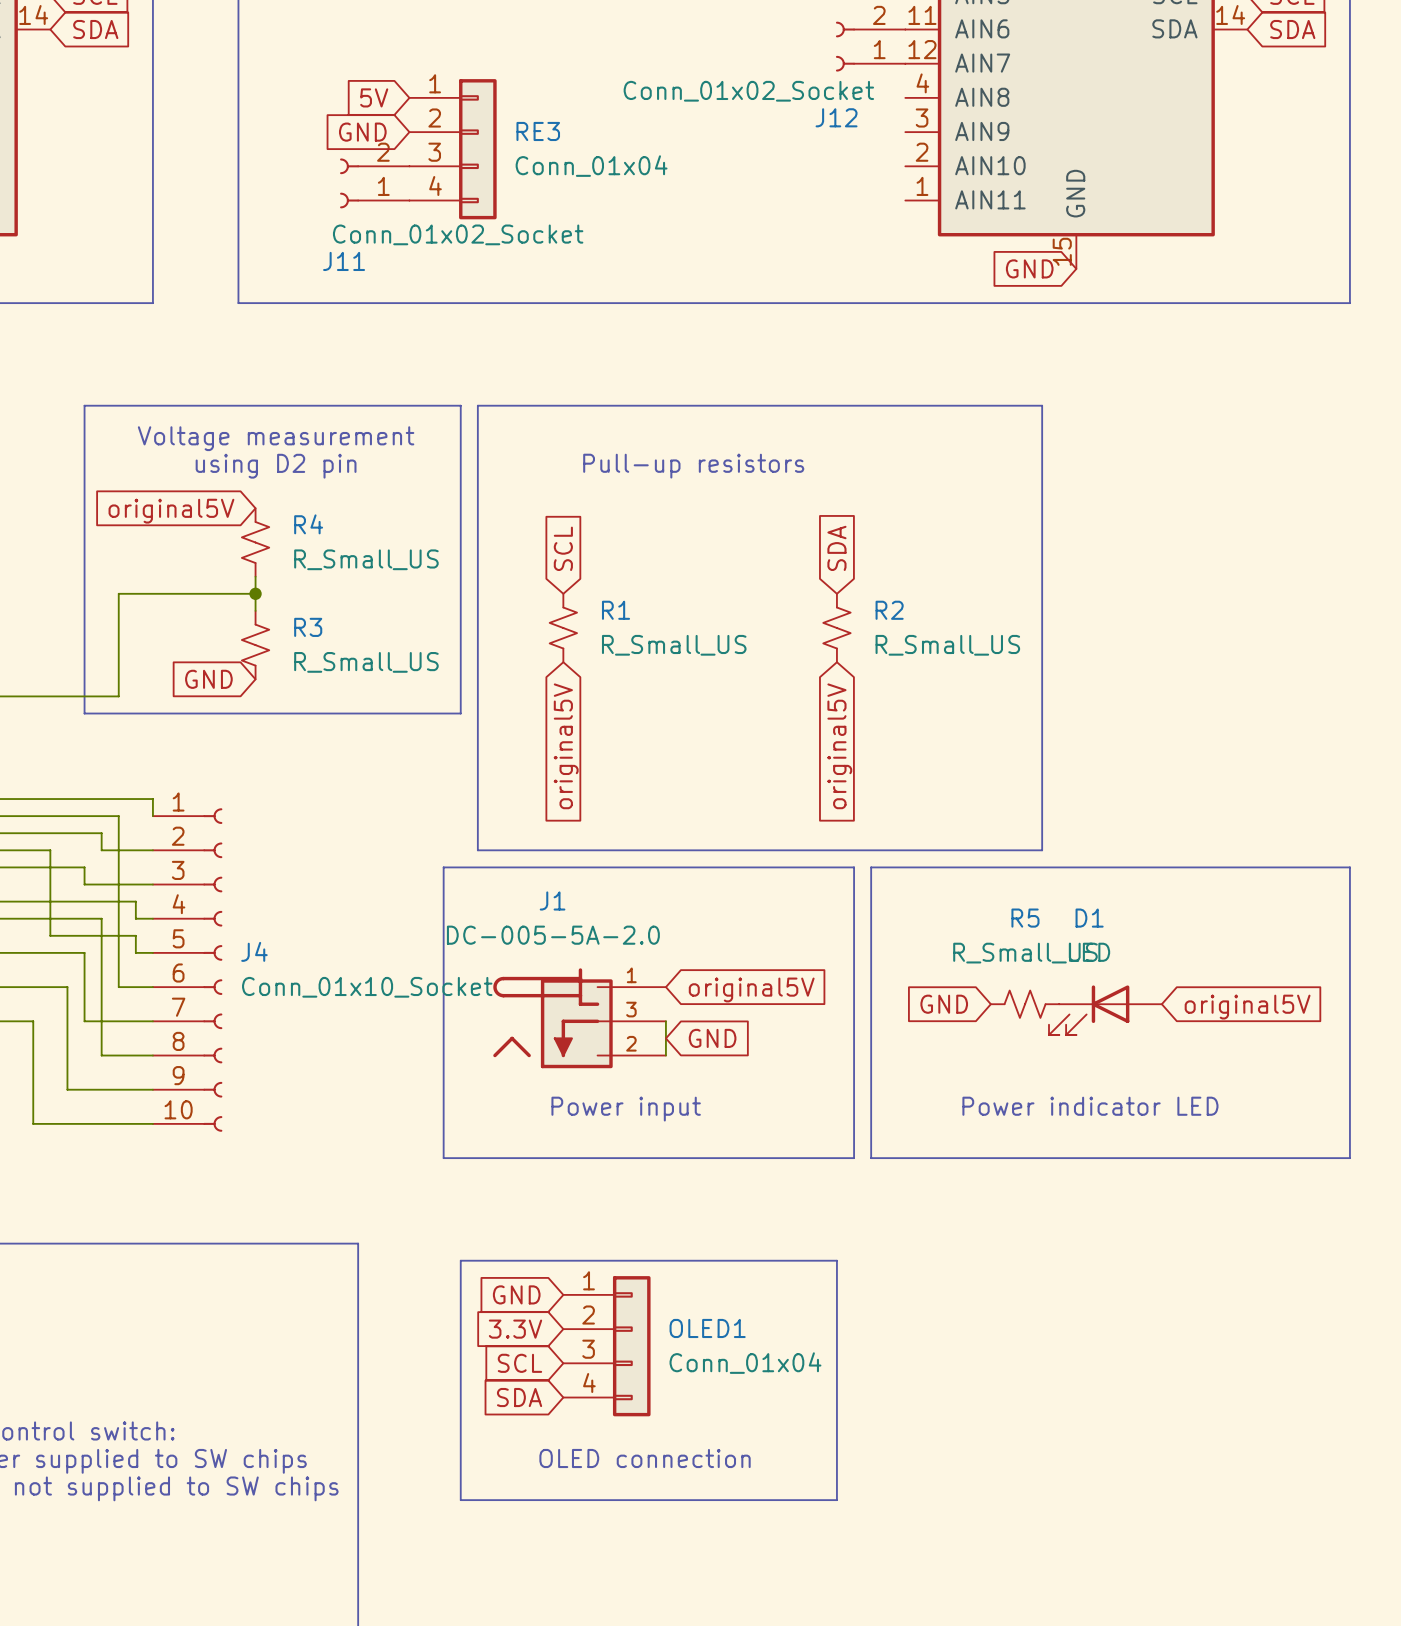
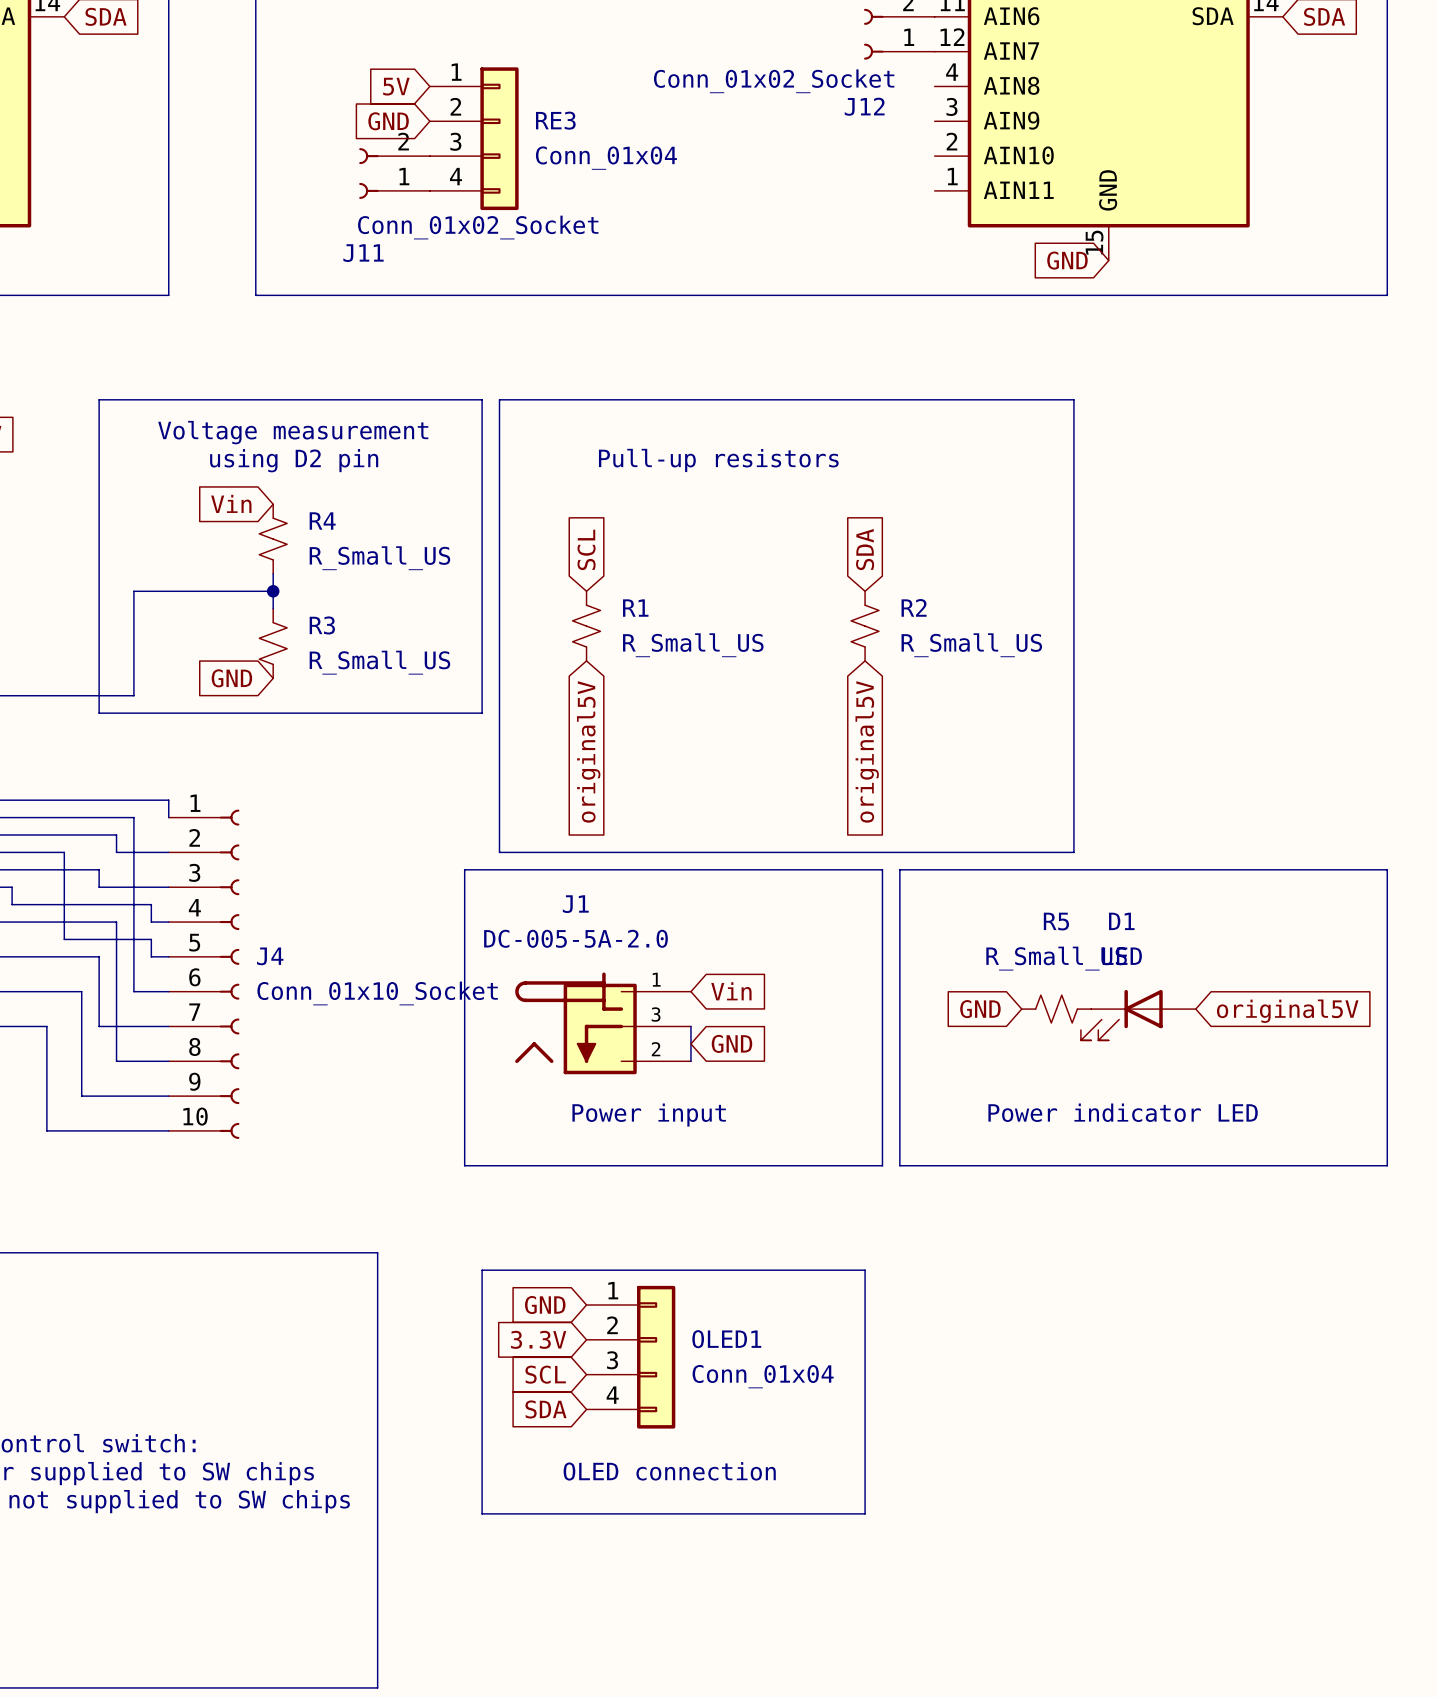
global label: original5V (171, 511) -> Vin (231, 503)
global label: original5V (751, 989) -> Vin (731, 991)

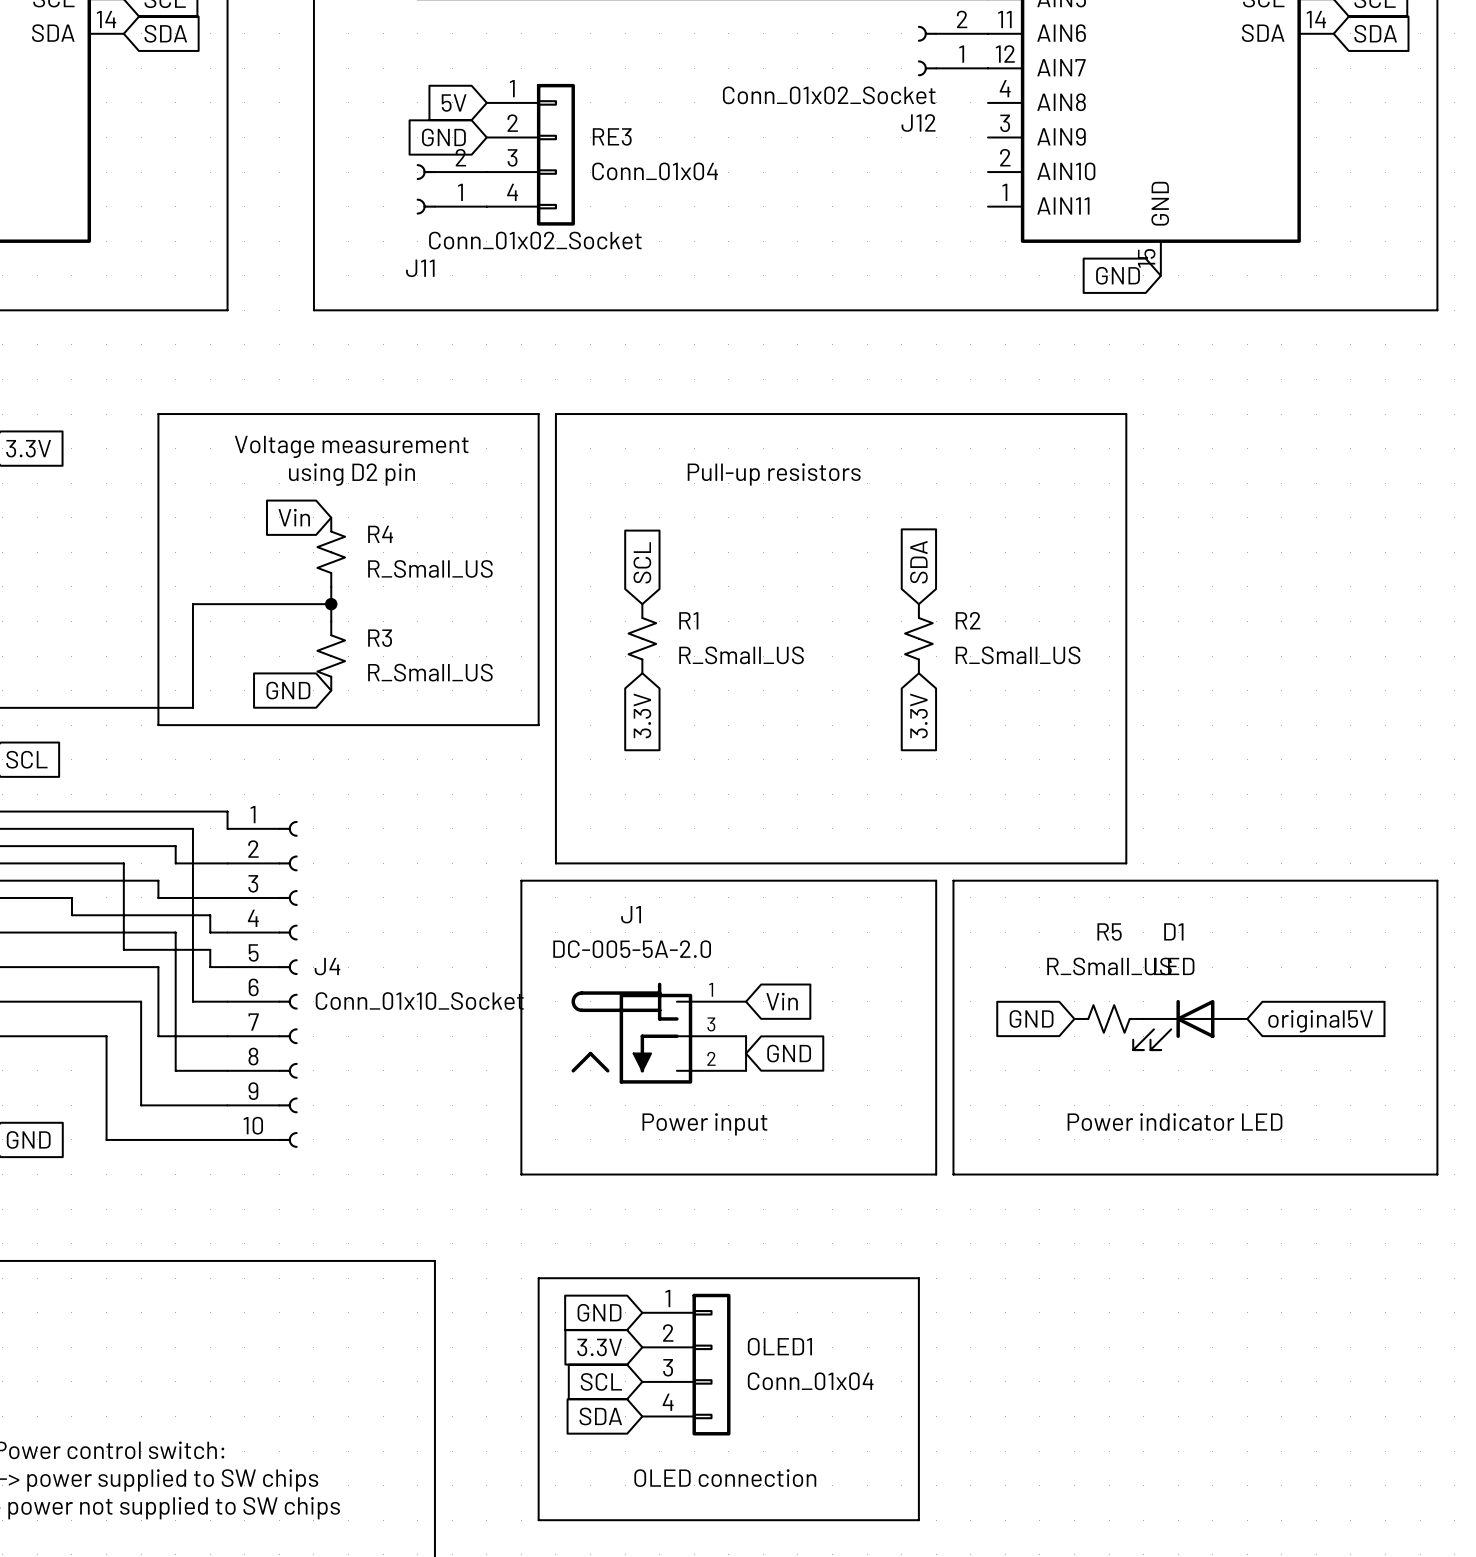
global label: original5V (588, 751) -> 3.3V (642, 715)
global label: original5V (867, 751) -> 3.3V (918, 715)

